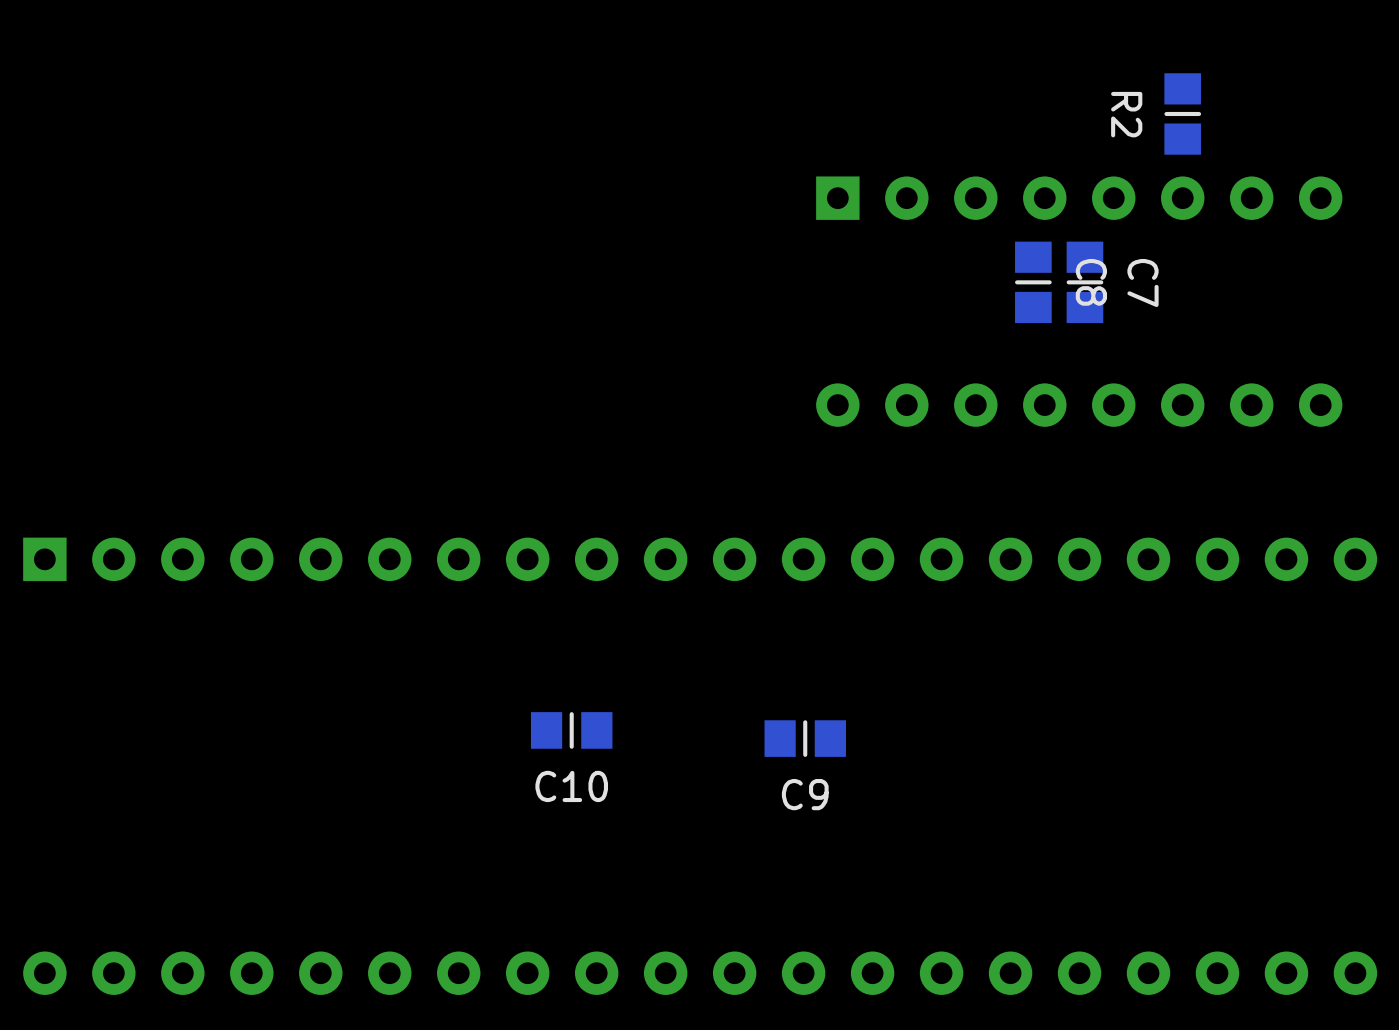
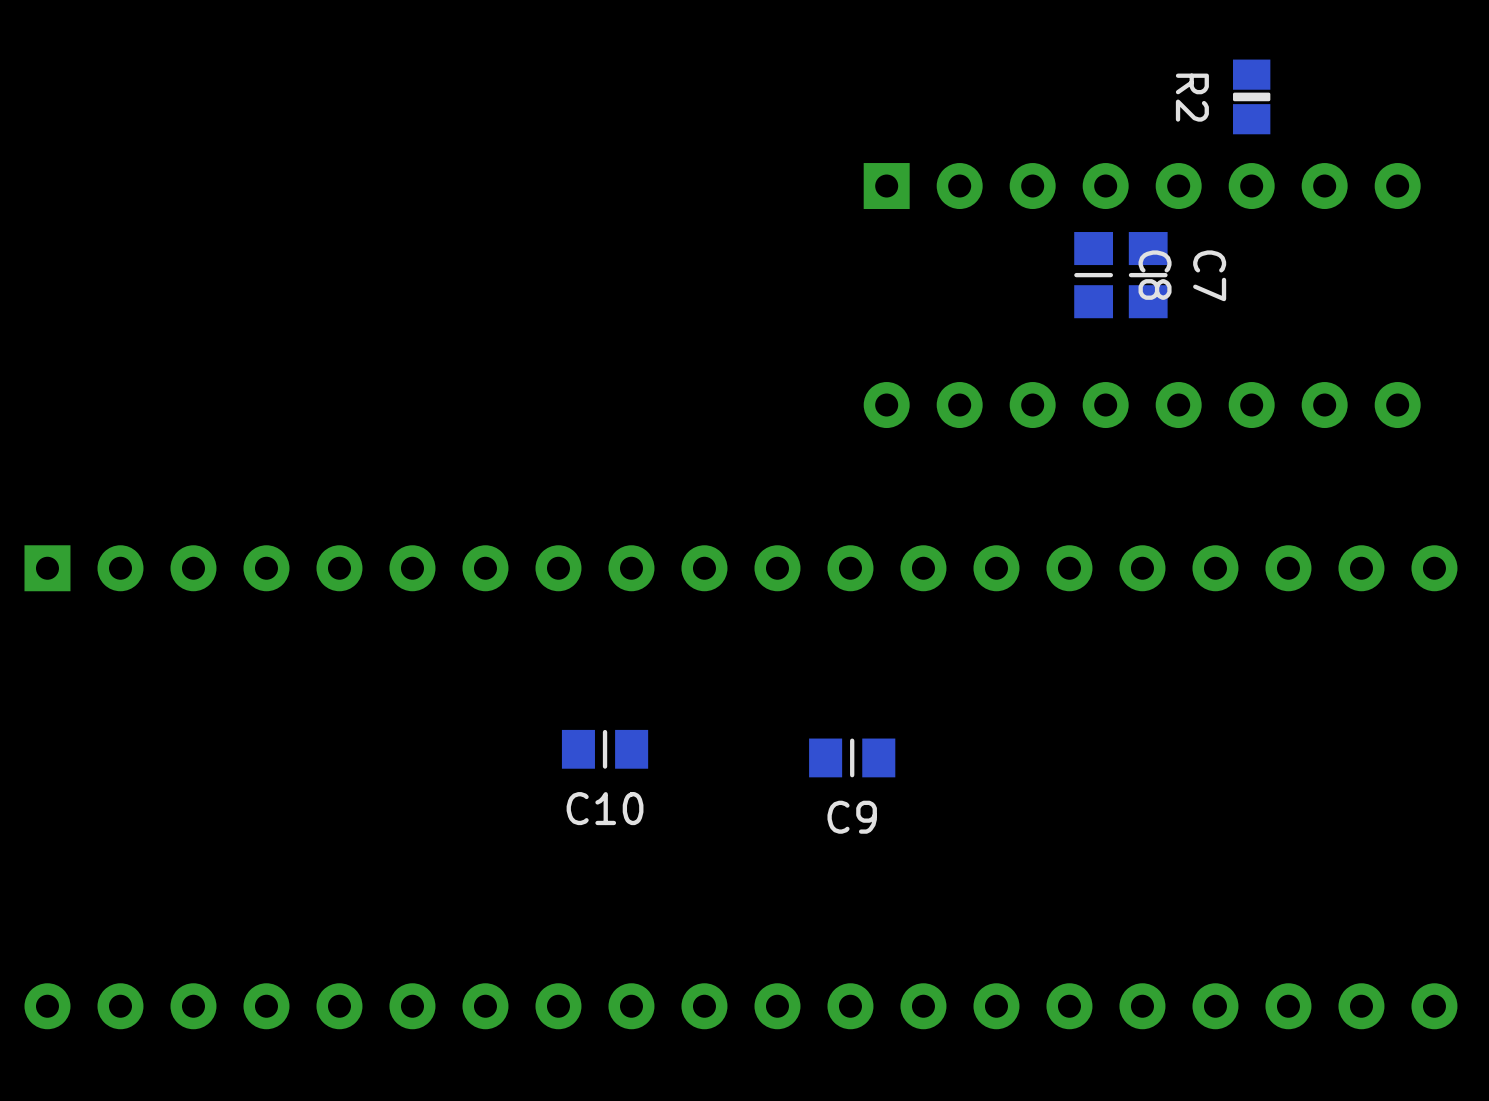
R2 footprint: [1164, 73, 1202, 155] -> [1232, 59, 1271, 135]

